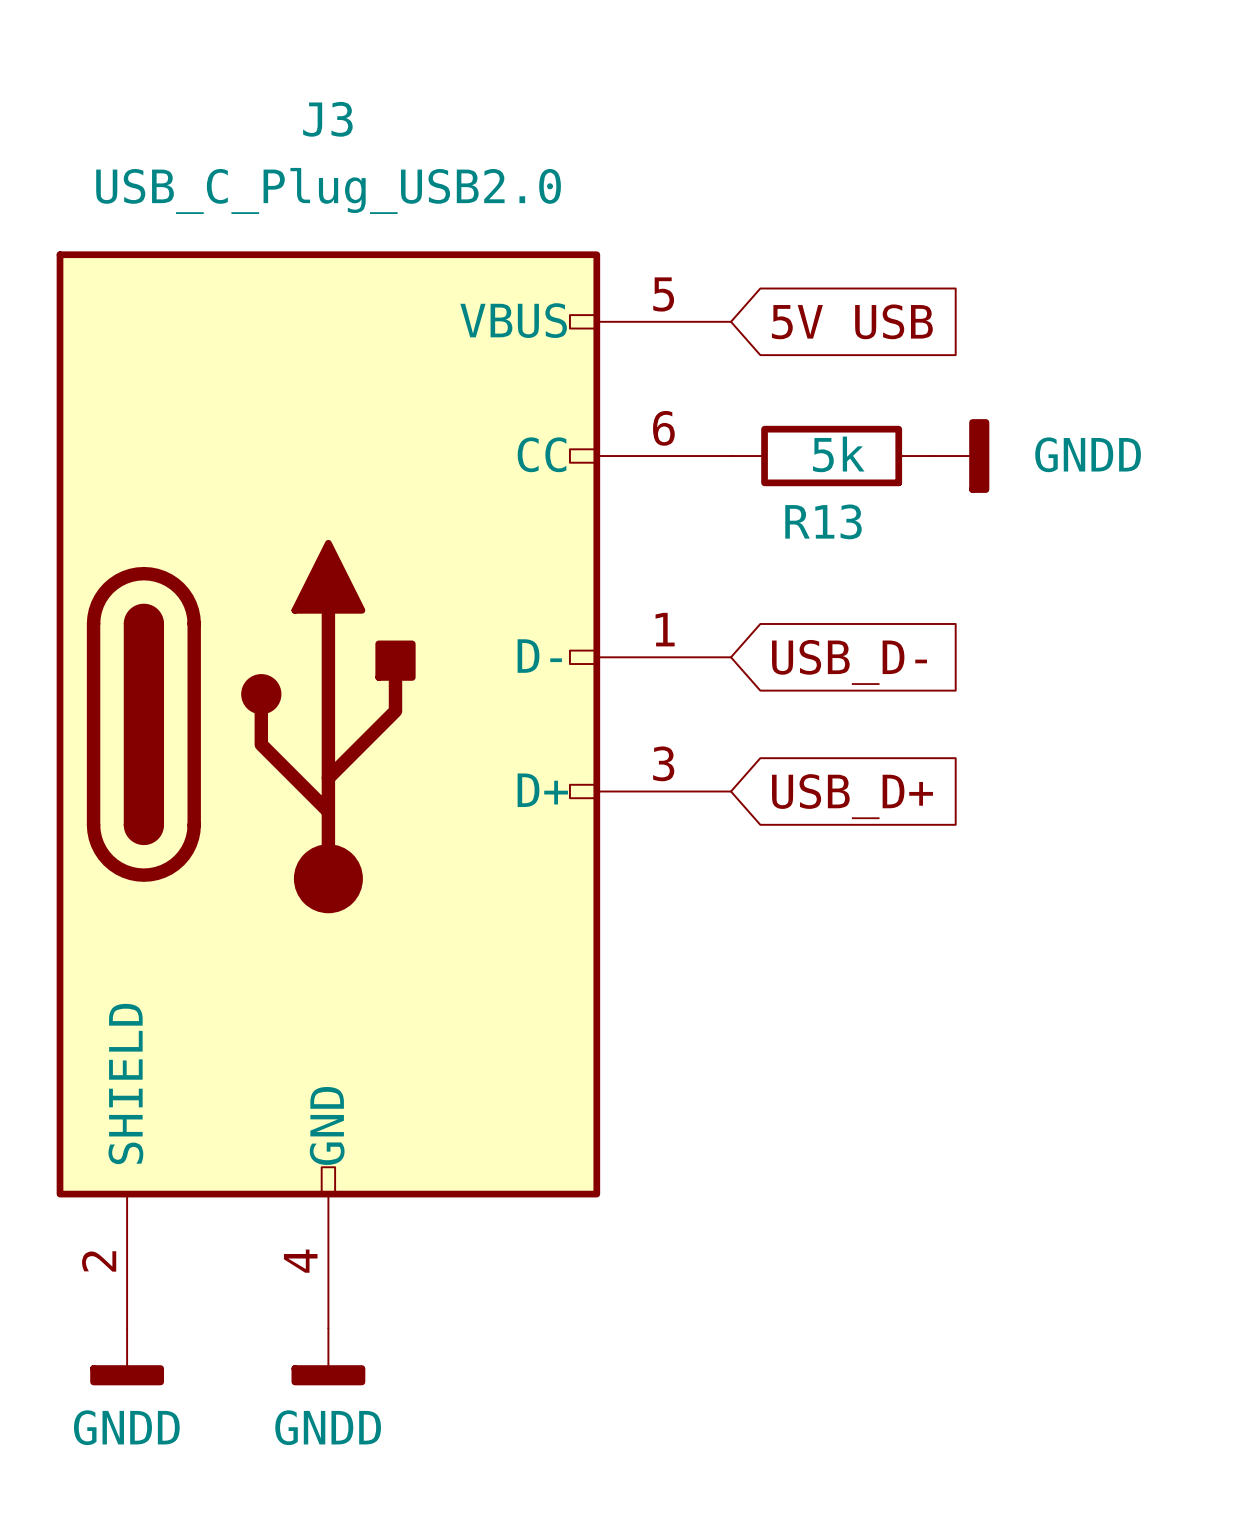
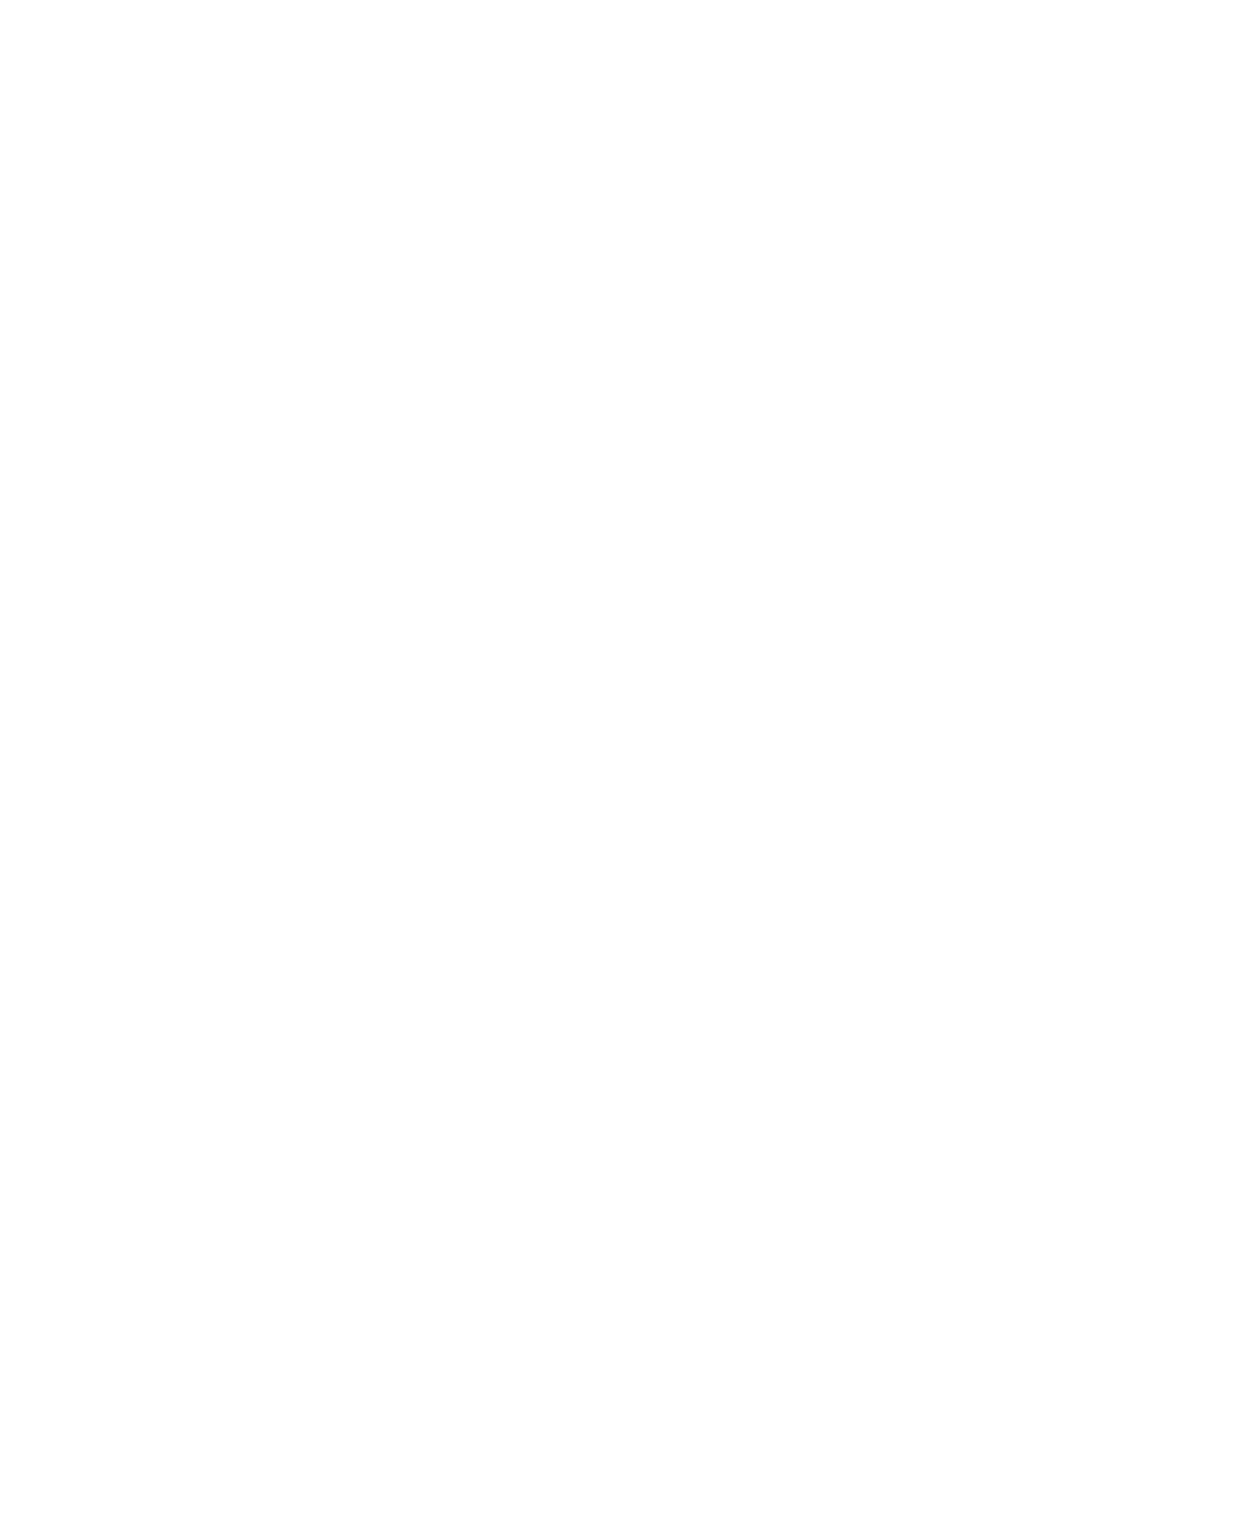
global label: 5V USB (852, 321) -> none
R13: 5k (831, 456) -> none
power symbol: GNDD (960, 456) -> none
global label: USB_D- (849, 662) -> none
J3: USB_C_Plug_USB2.0 (393, 789) -> none
global label: USB_D+ (852, 796) -> none
power symbol: GNDD (127, 1356) -> none
power symbol: GNDD (328, 1356) -> none

